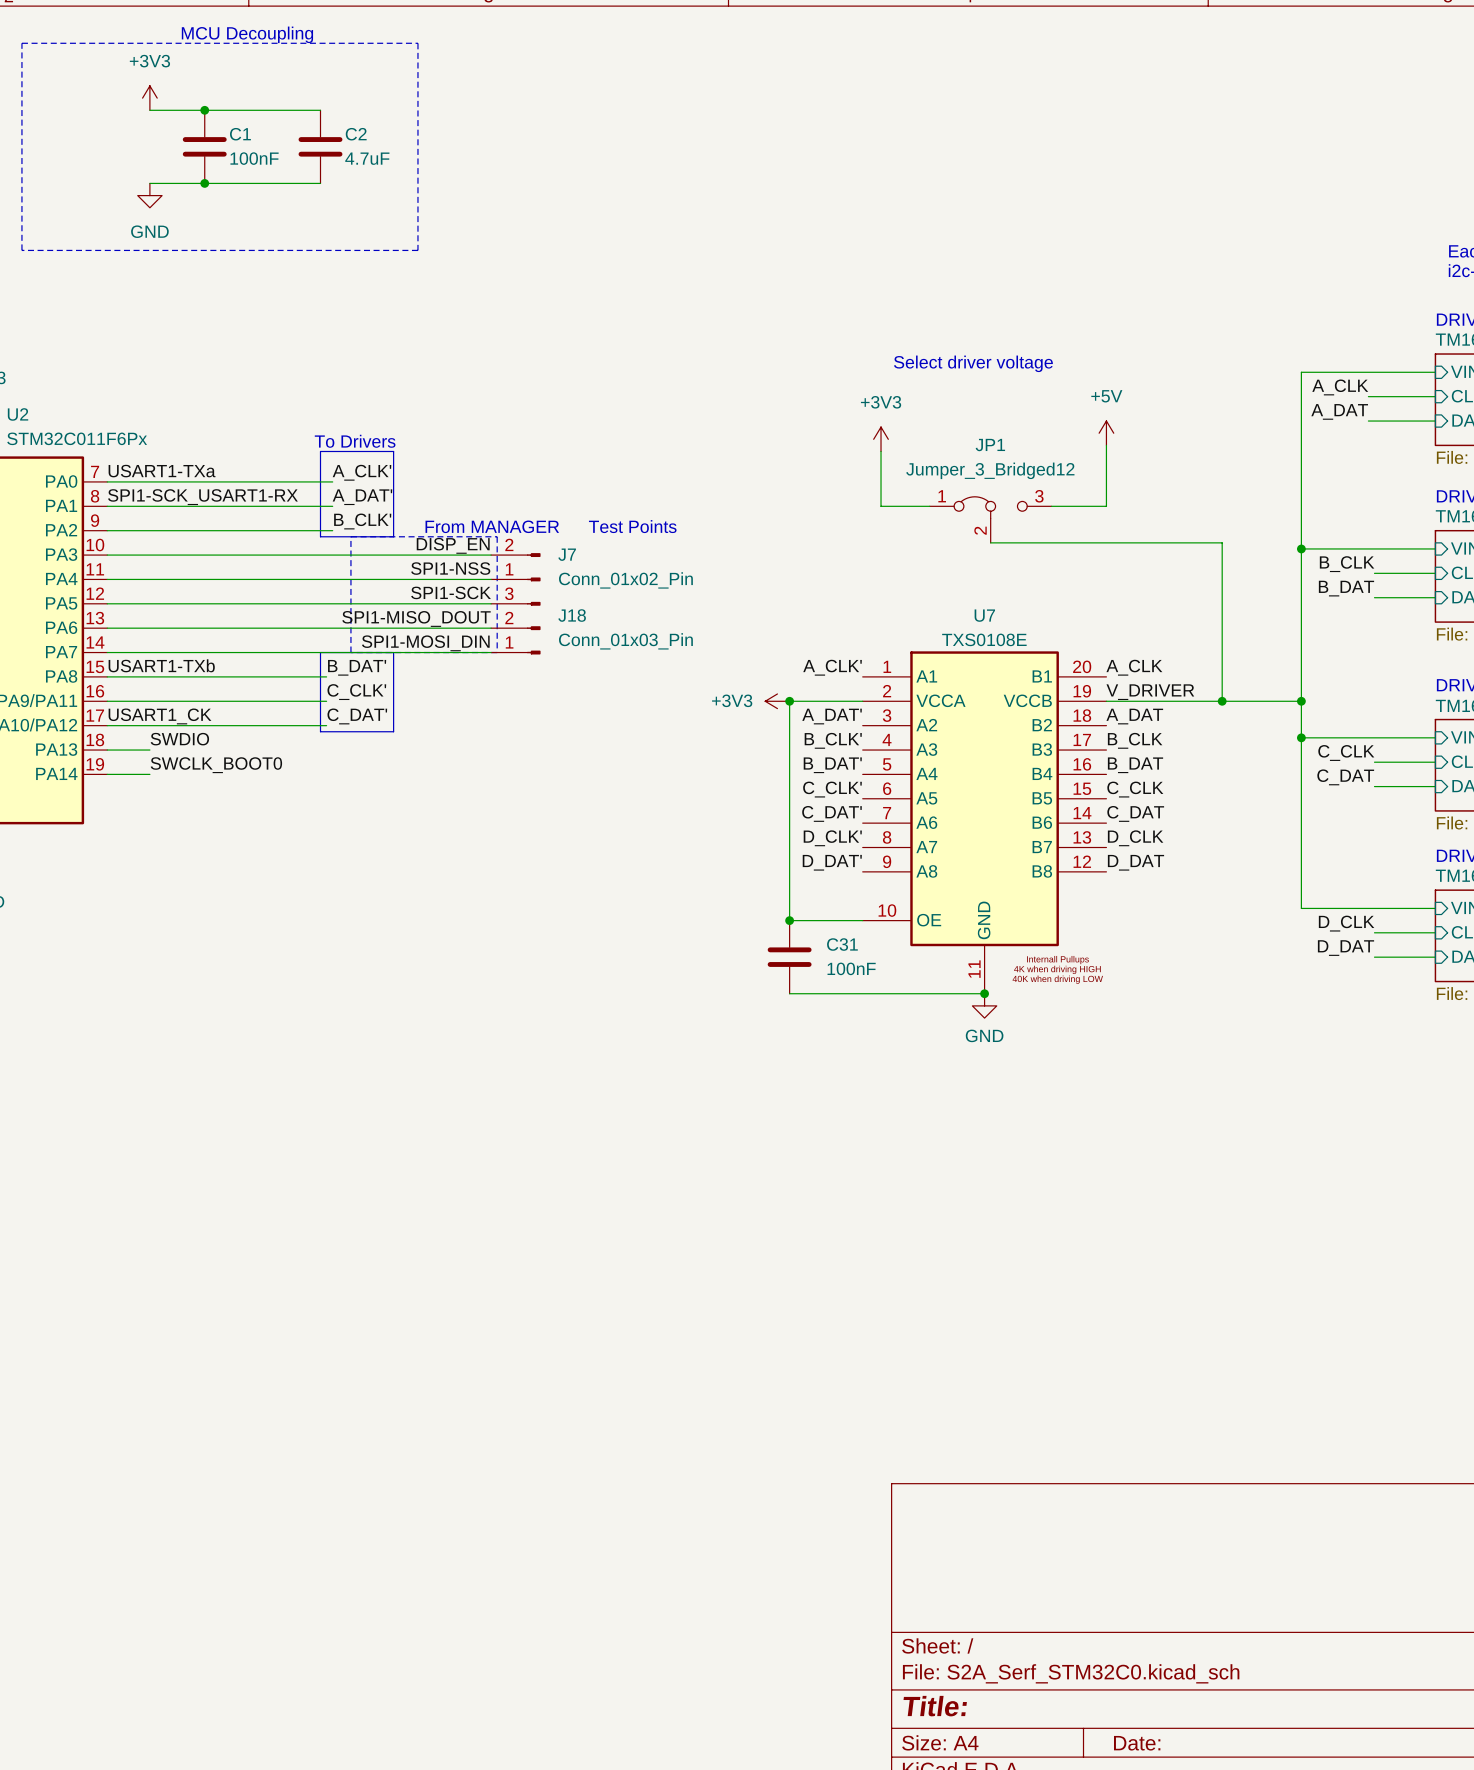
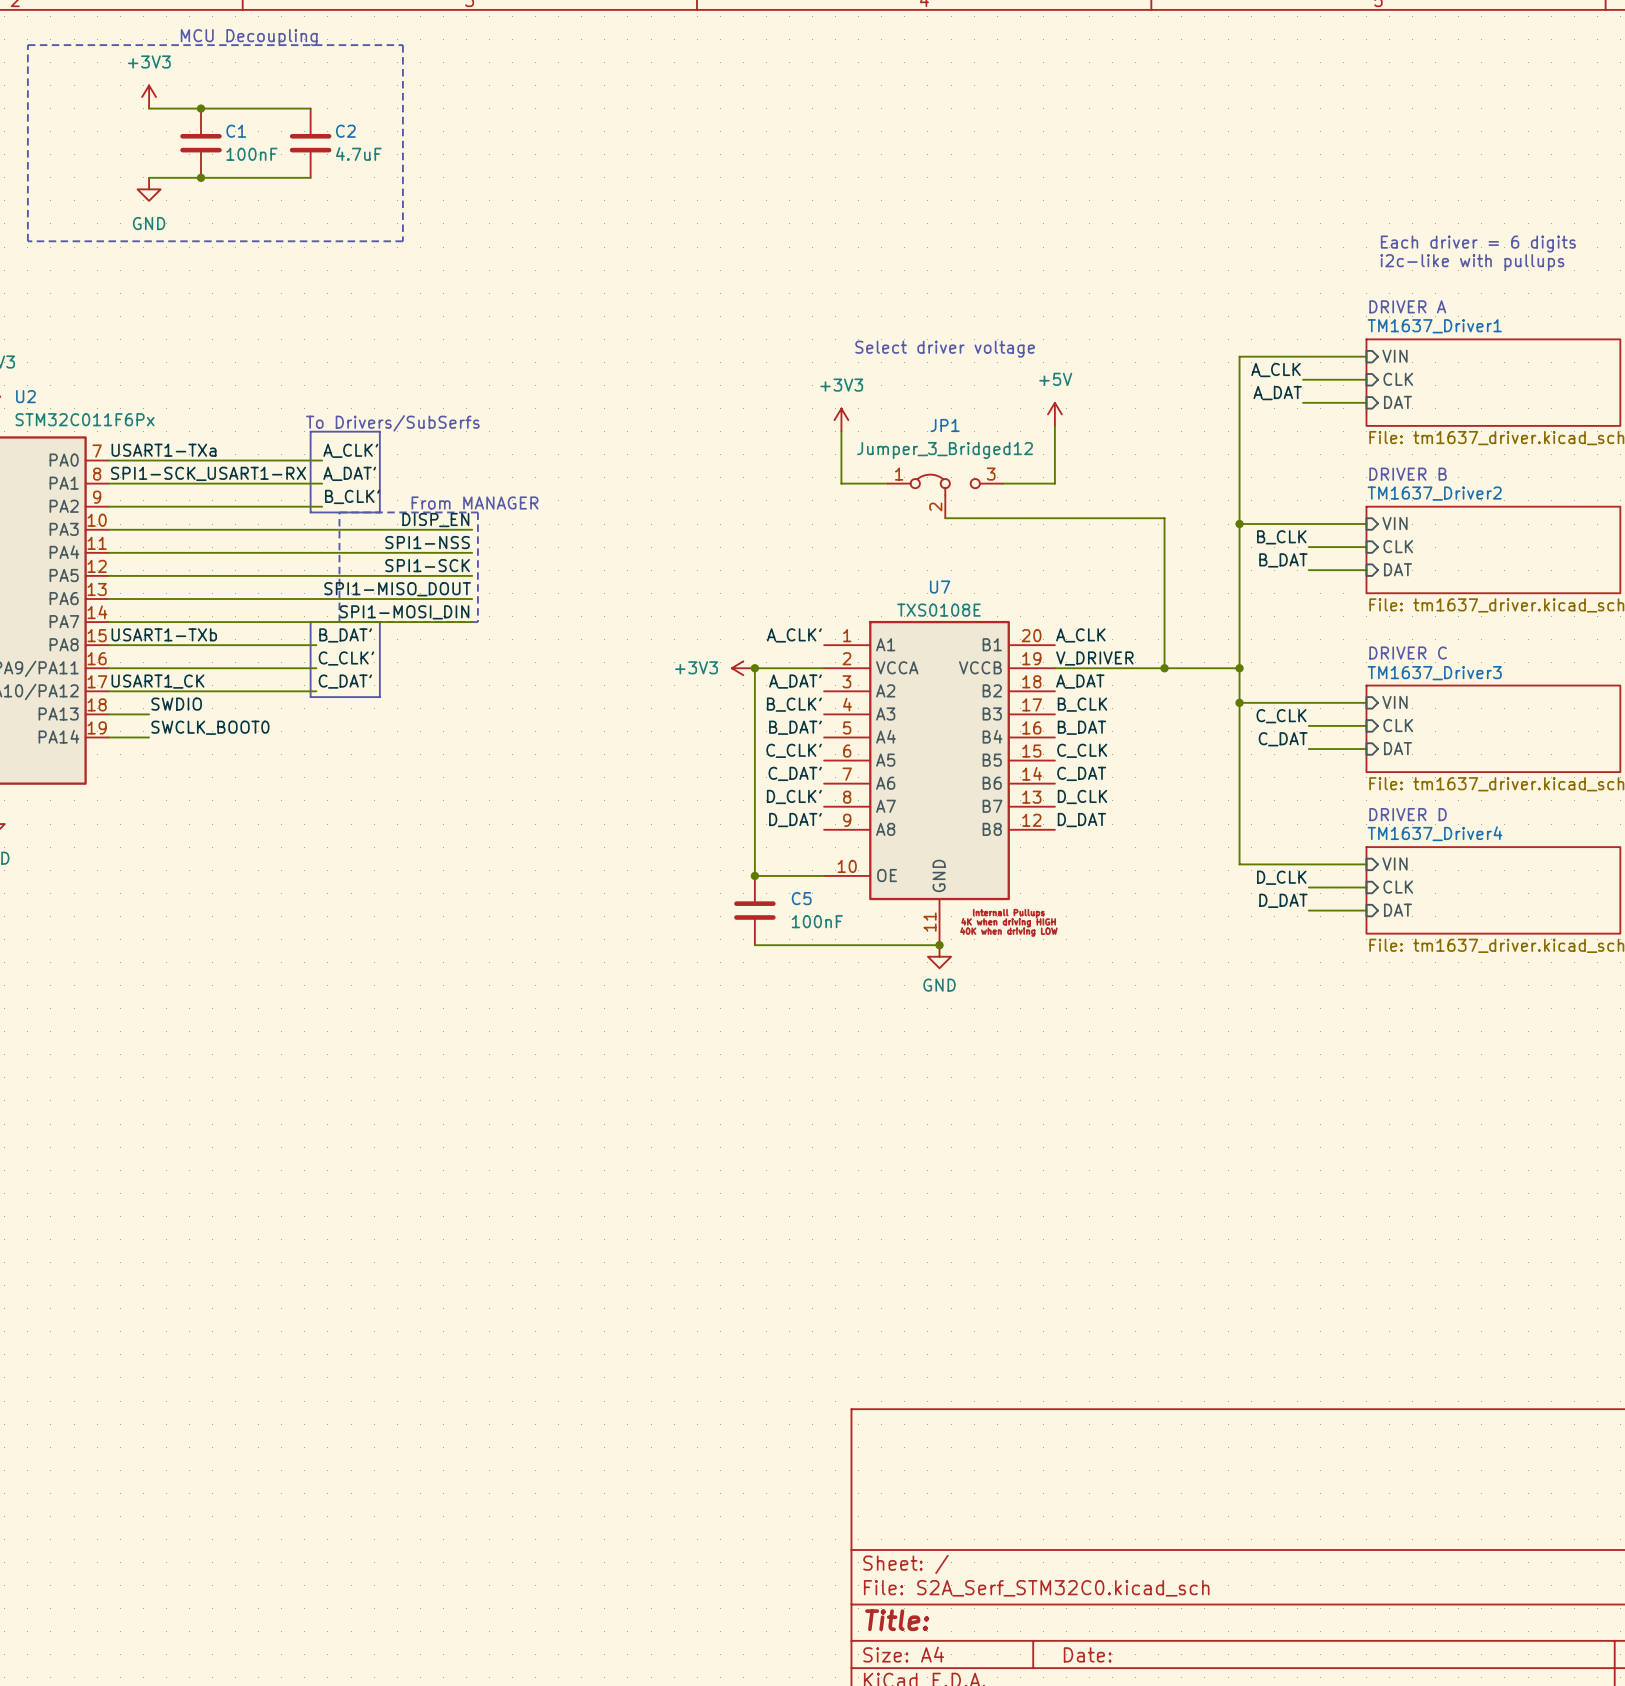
text: To Drivers (355, 441) -> To Drivers/SubSerfs (392, 423)
text: Test Points (632, 526) -> none
J7: Conn_01x02_Pin (515, 567) -> none
J18: Conn_01x03_Pin (515, 628) -> none
C31 name: C31 (842, 944) -> C5 (801, 898)

